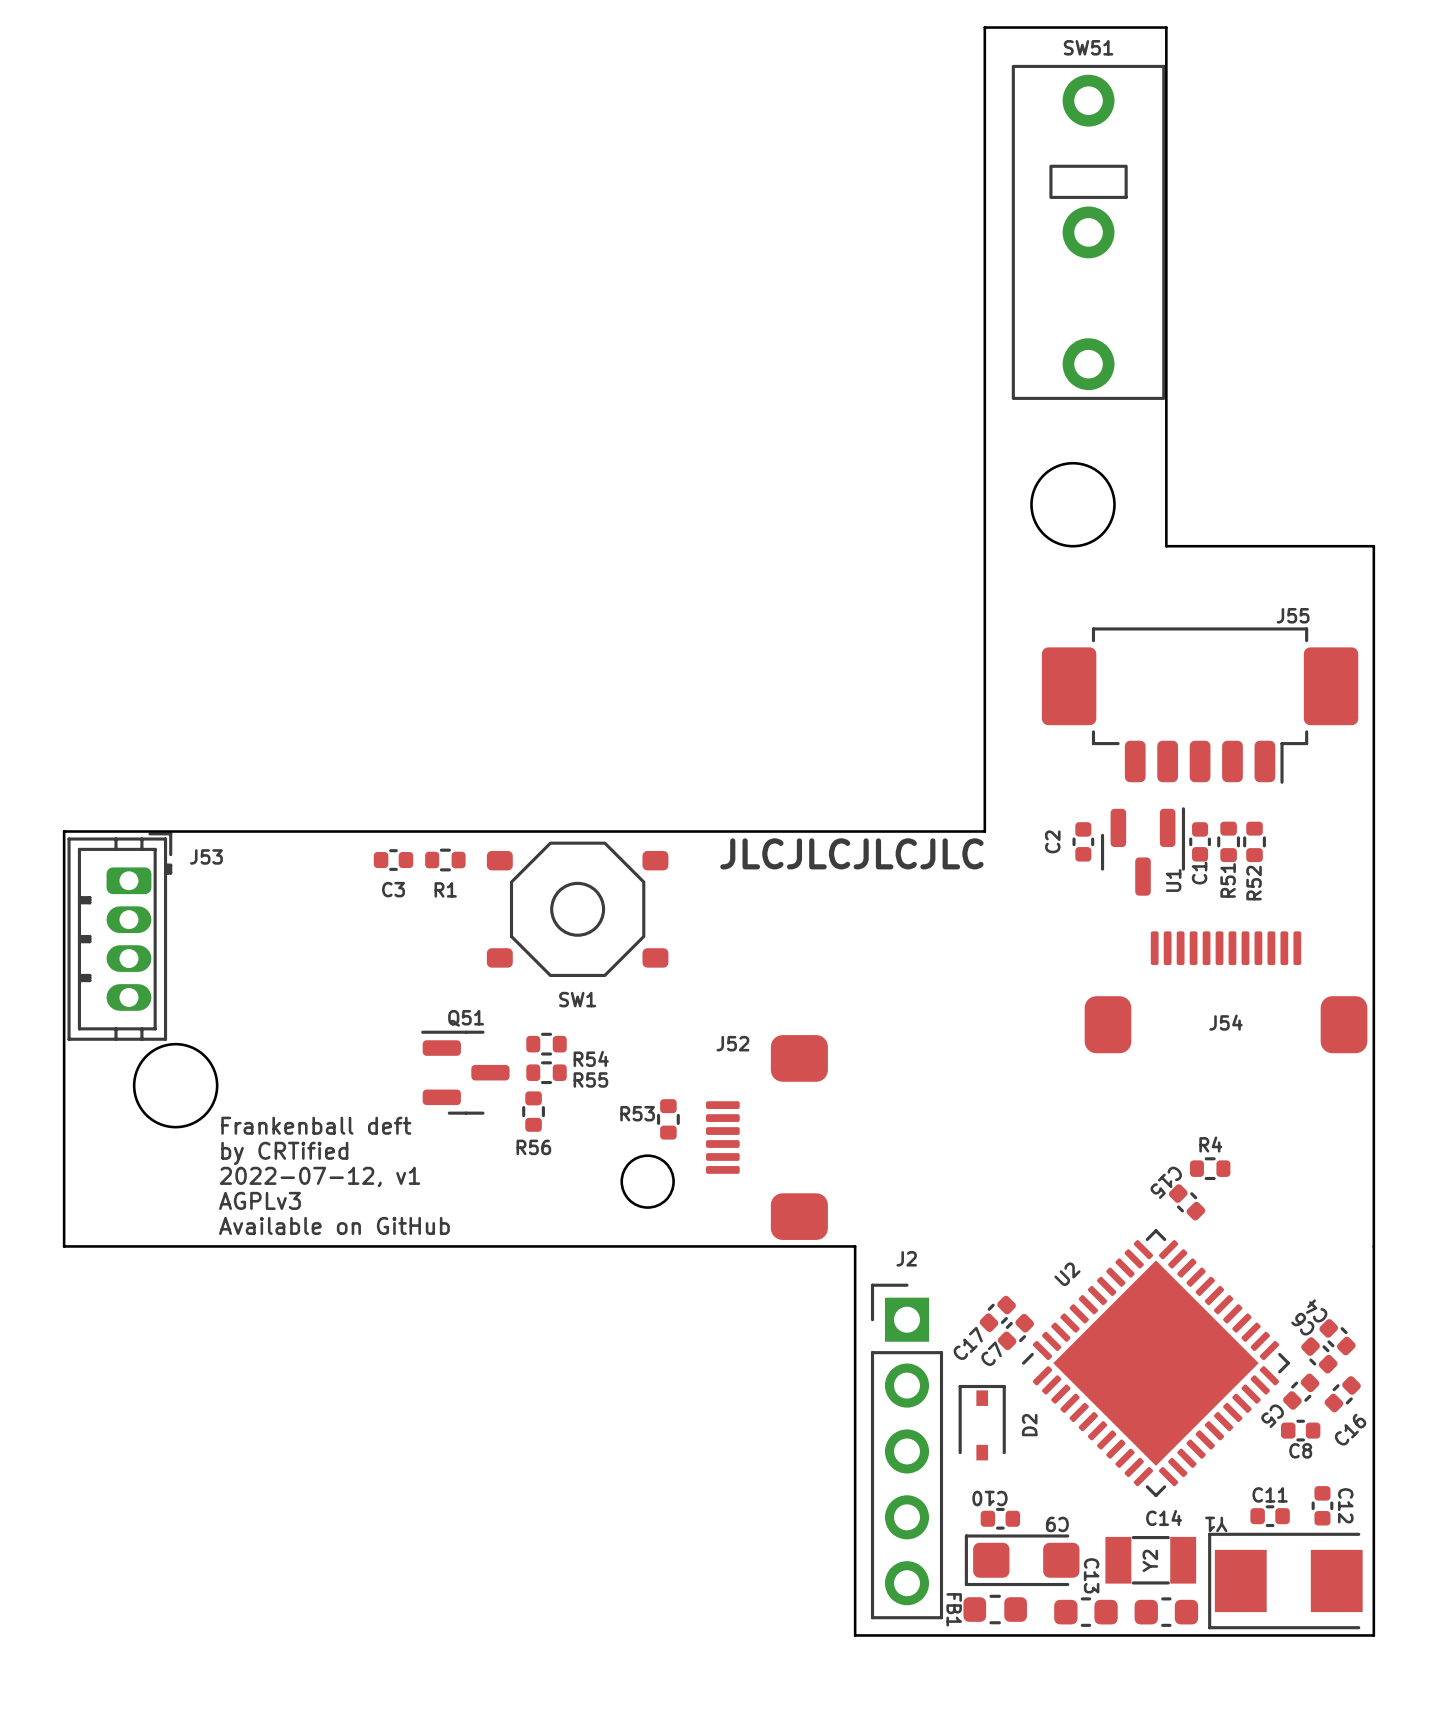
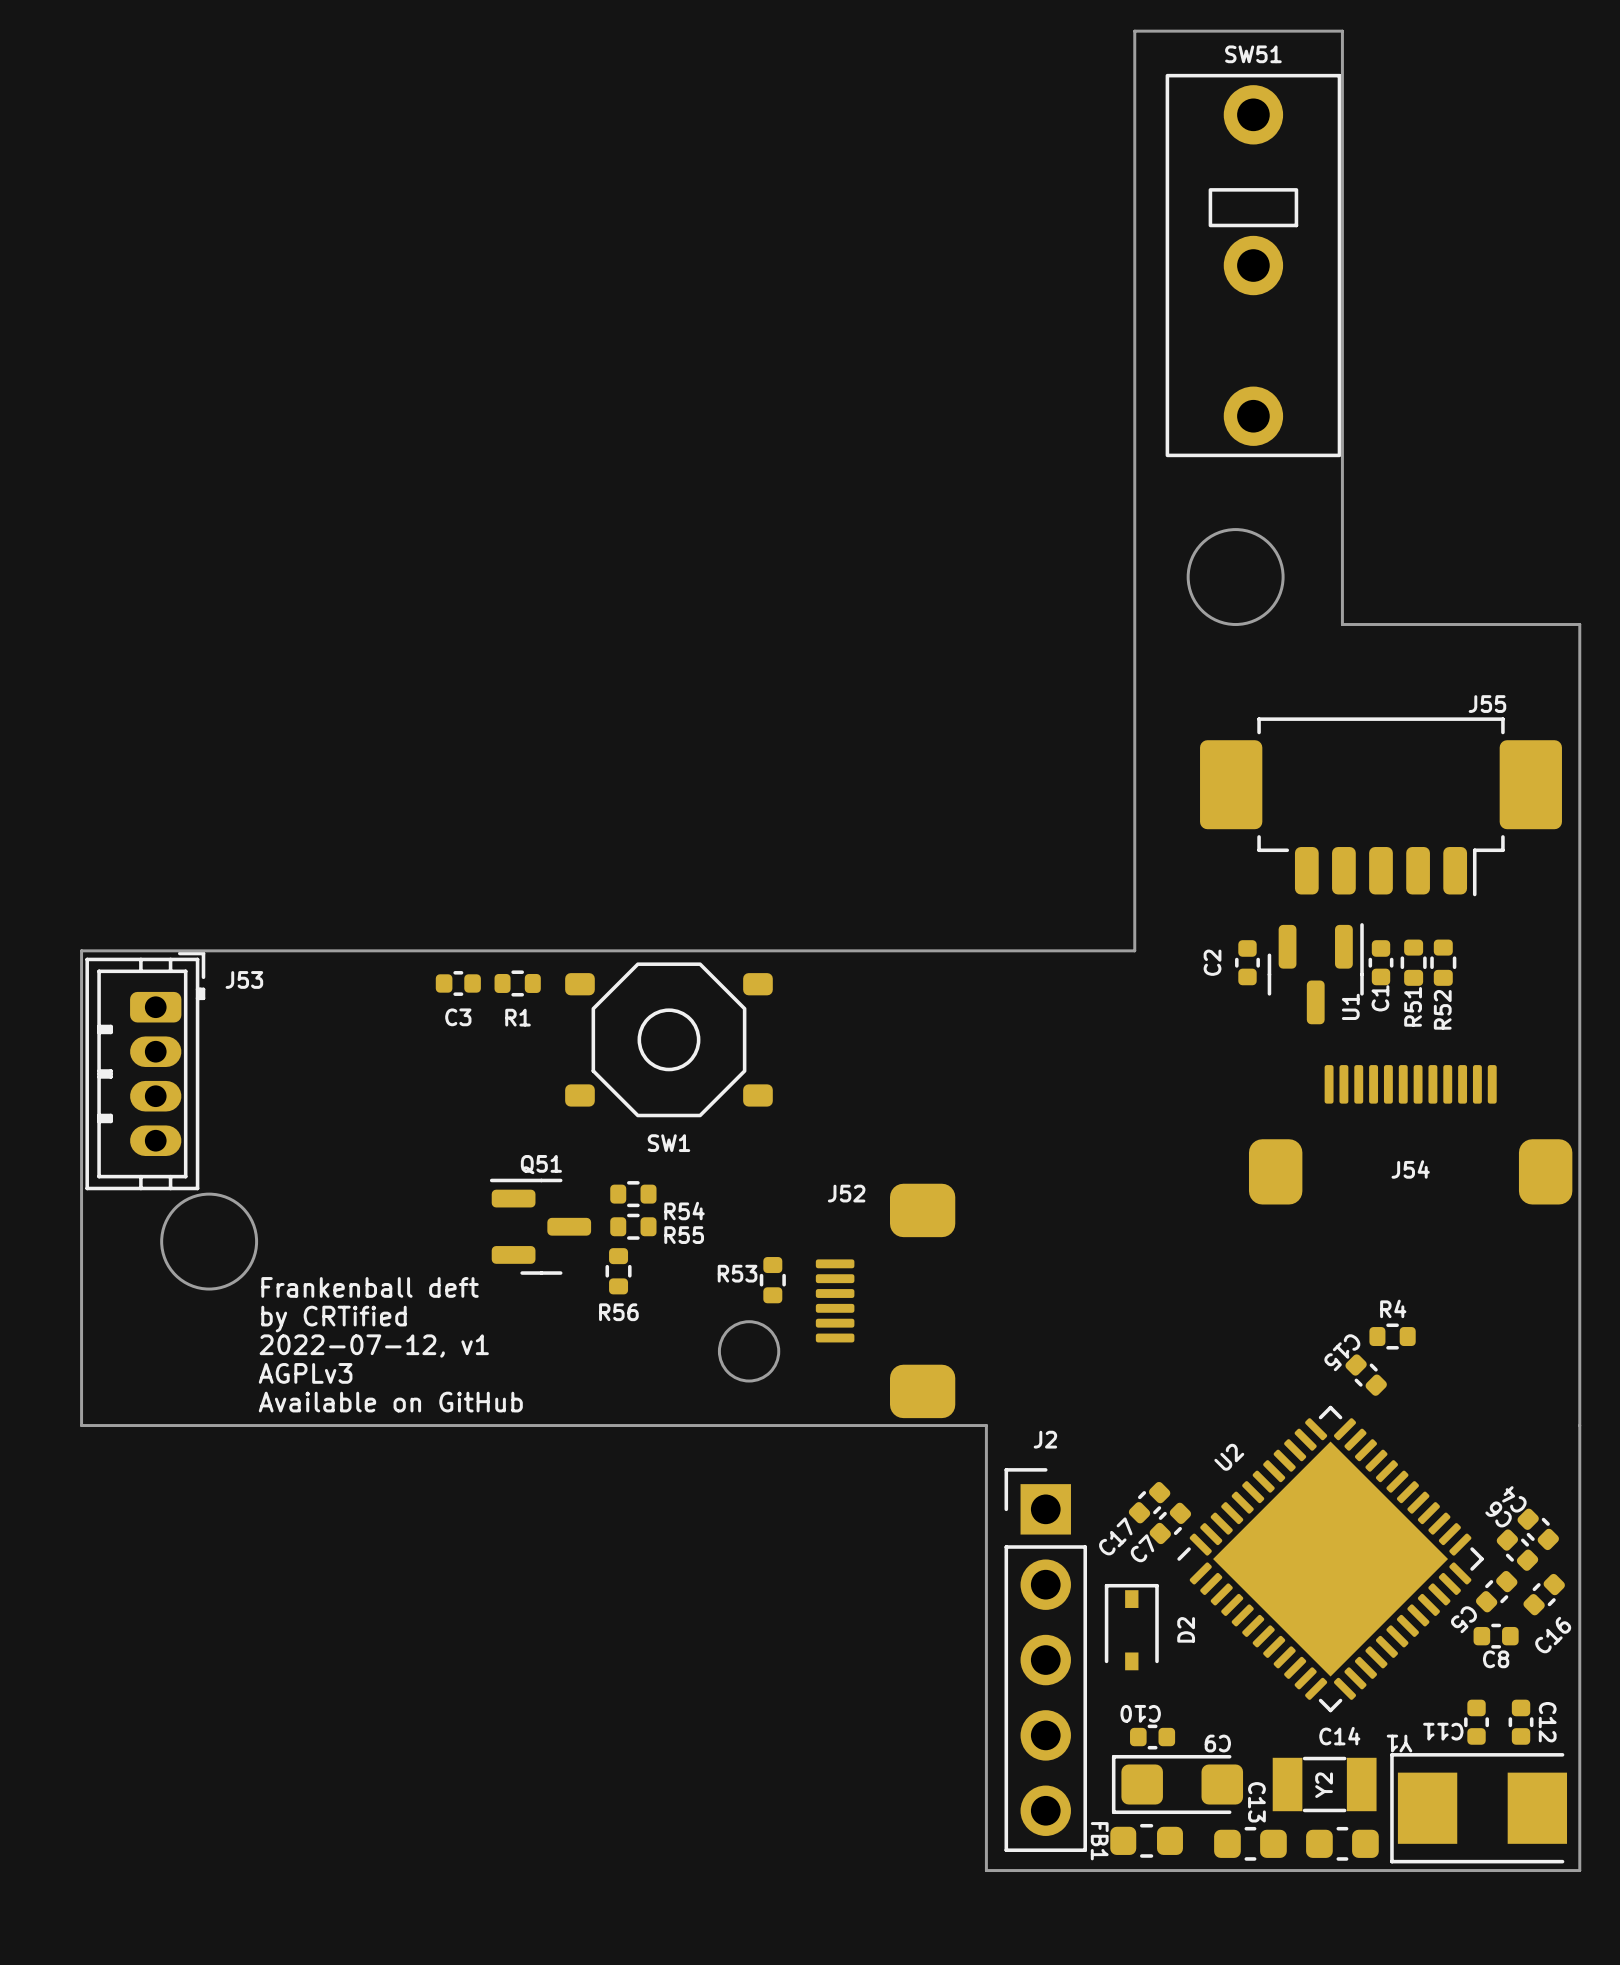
text: JLCJLCJLCJLC (851, 853) -> none
C11 rotation: 0° (1270, 1516) -> 90° clockwise (1476, 1722)

